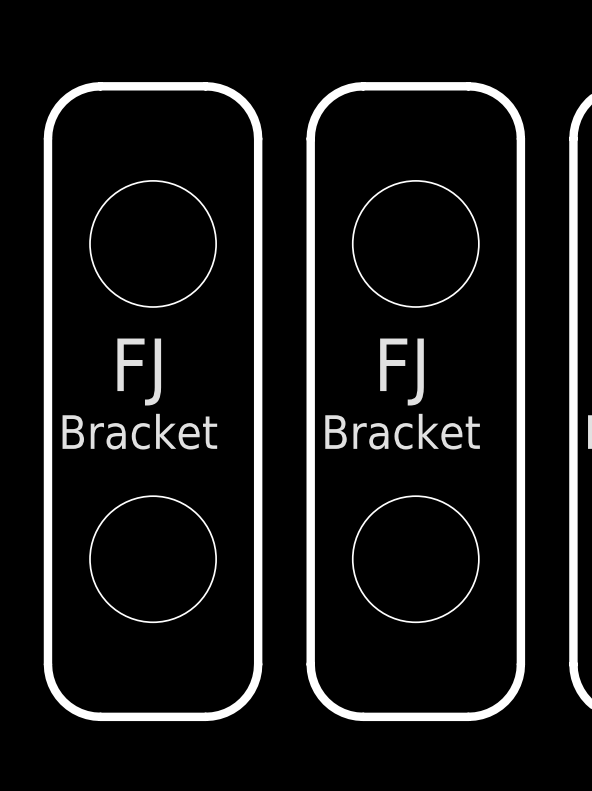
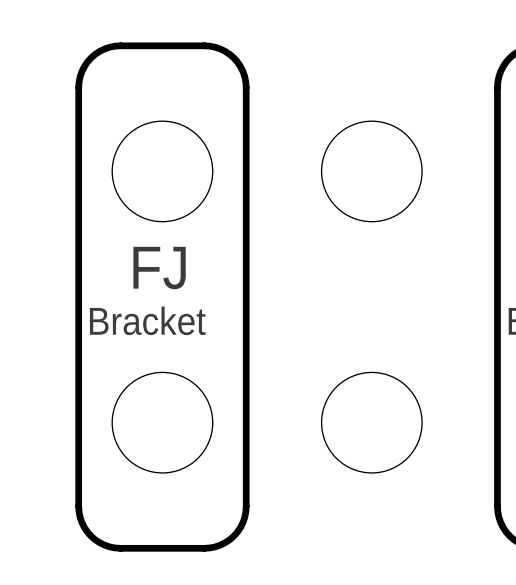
board edge: (363, 86) (468, 86) (481, 88) (494, 93) (510, 106) (516, 118) (520, 131) (520, 671) (513, 690) (505, 701) (494, 709) (475, 716) (363, 716) (349, 715) (336, 709) (321, 696) (314, 684) (311, 671) (311, 131) (317, 112) (331, 97) (349, 88) (363, 86) -> none
text: FJ (401, 372) -> none
text: Bracket (402, 431) -> none

